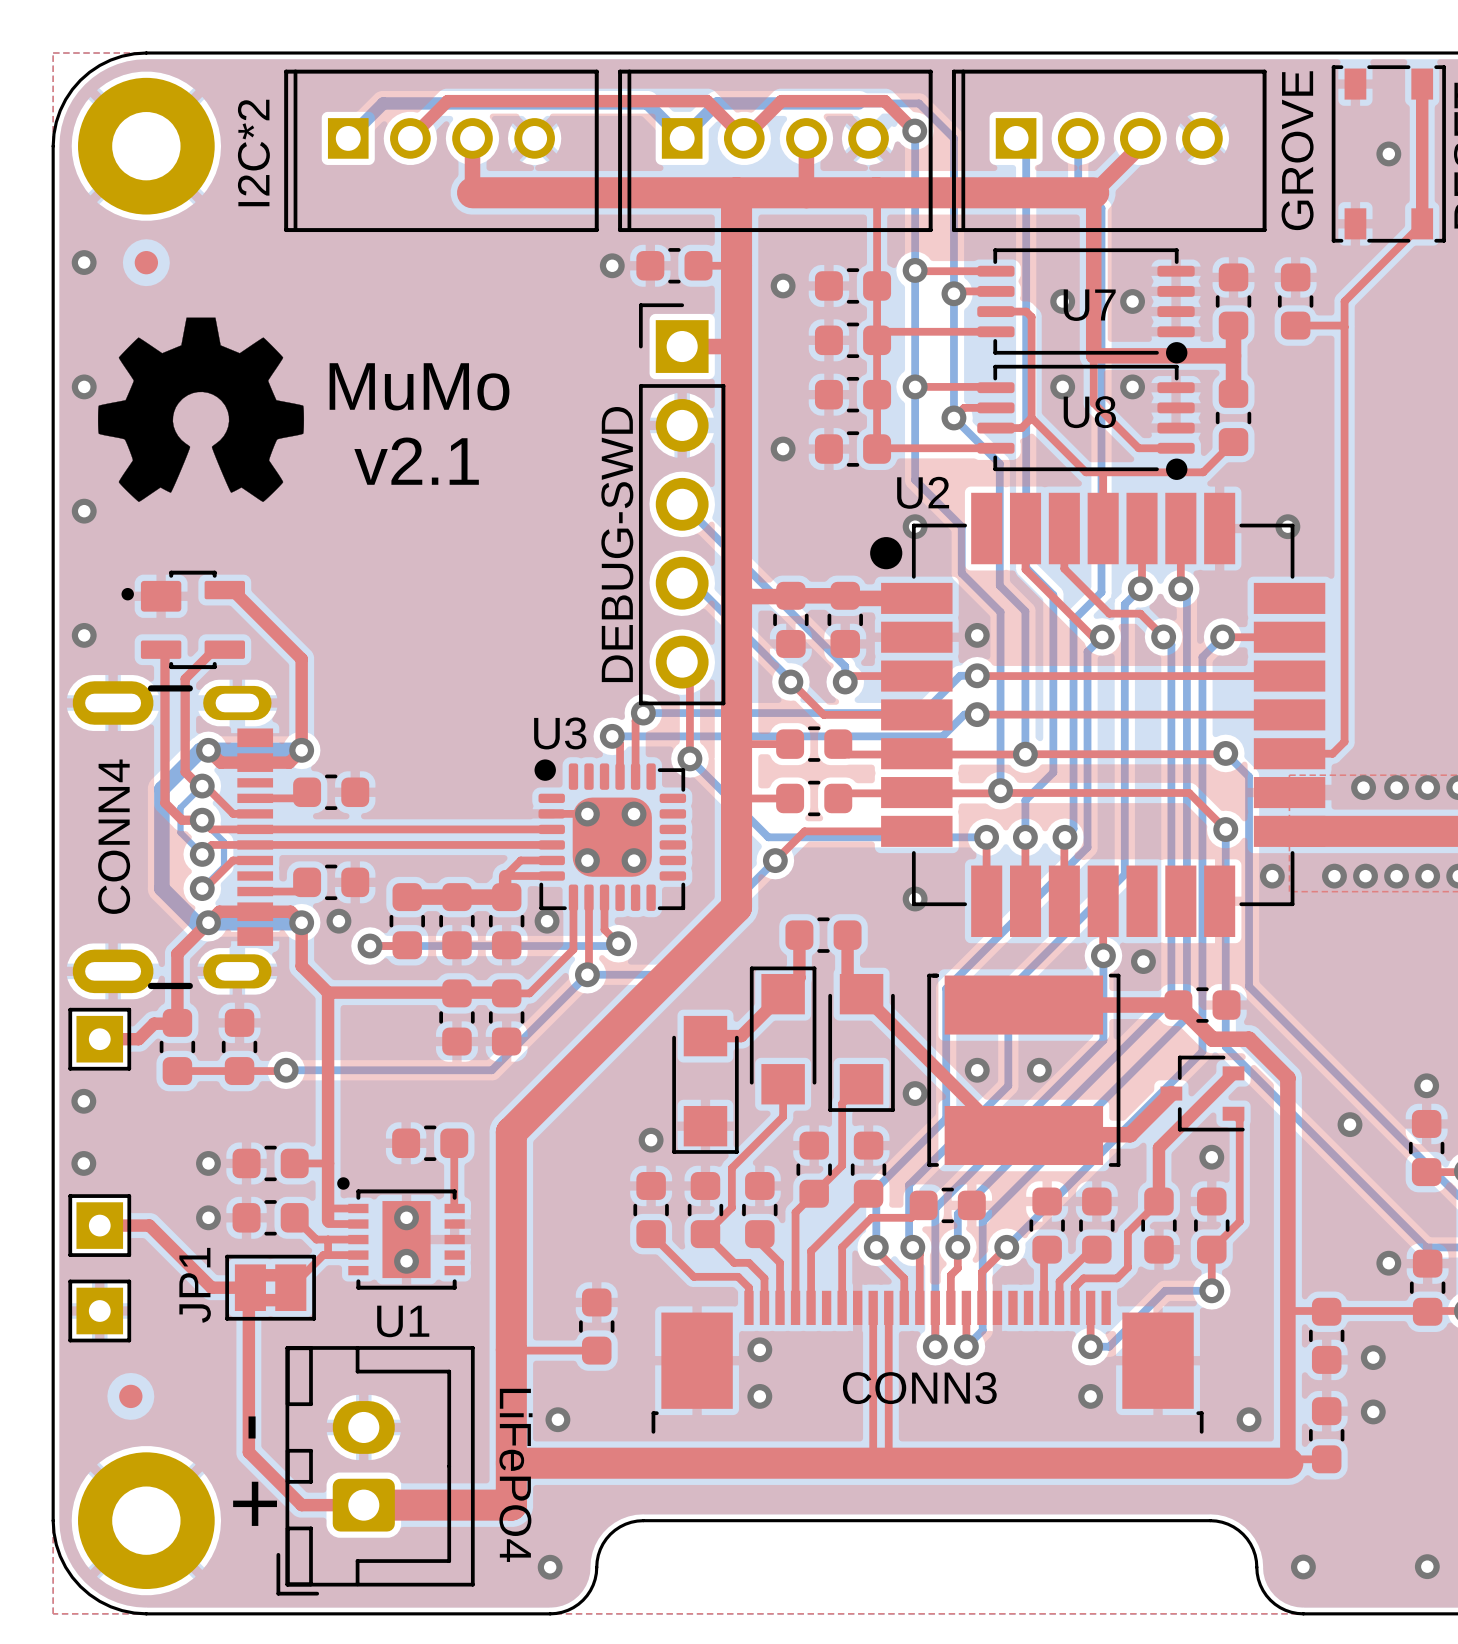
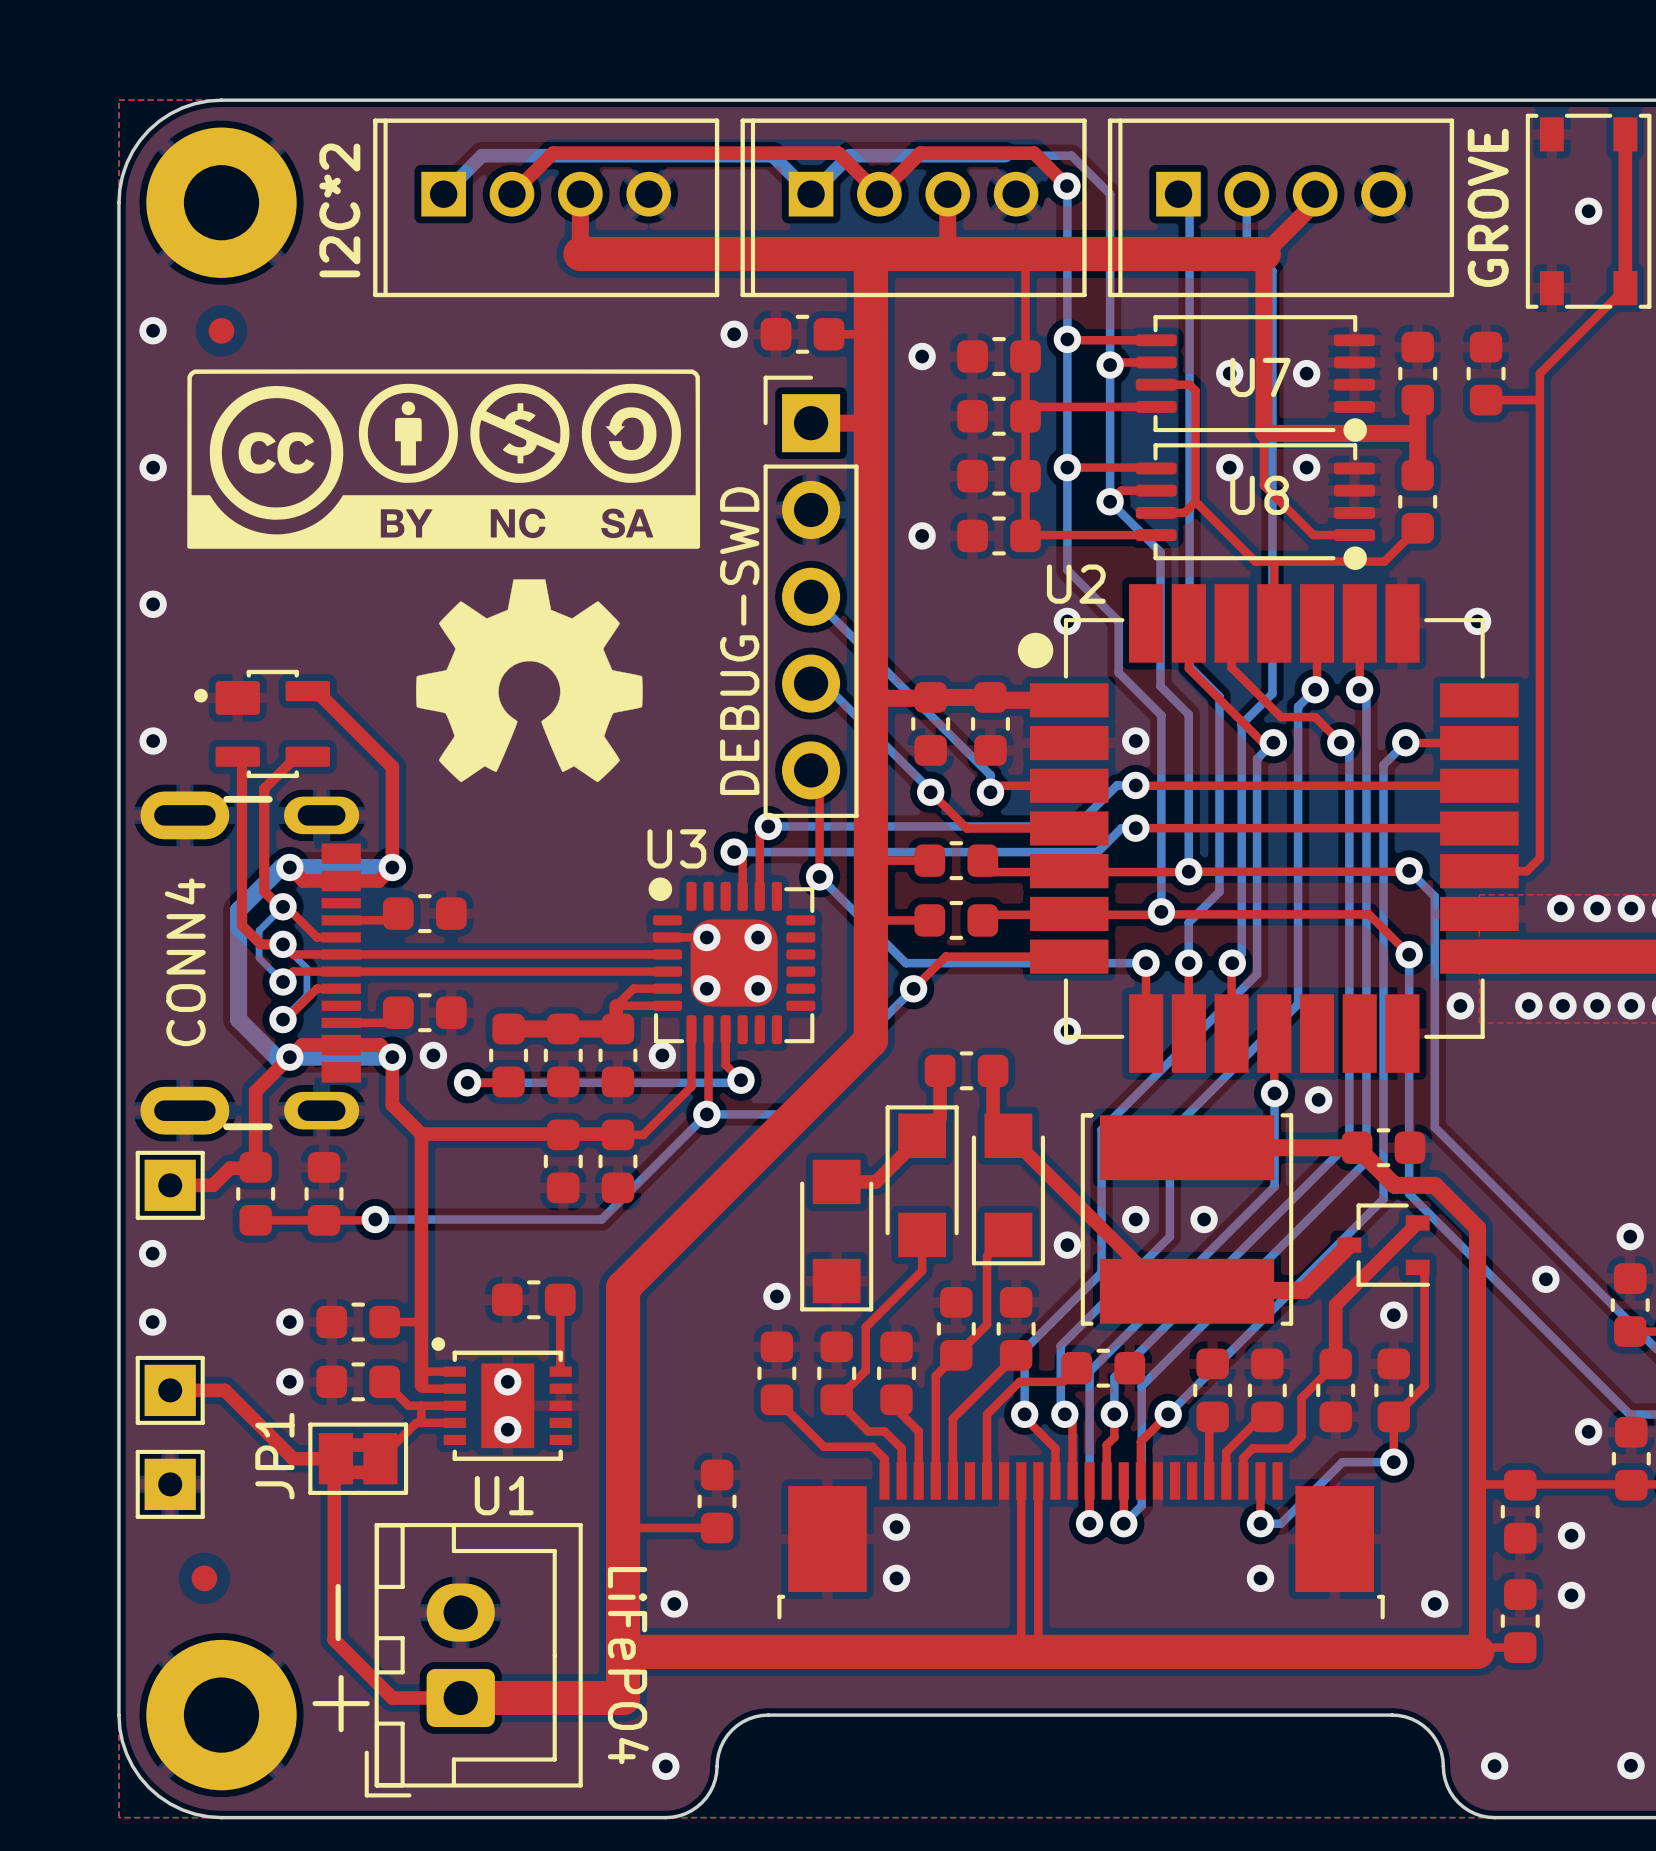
drawing: none -> [187, 369, 701, 549]
text: MuMo (419, 386) -> none
drawing position: (201, 409) -> (529, 680)
text: v2.1 (416, 461) -> none
CONN3 name: CONN3 (919, 1388) -> none

